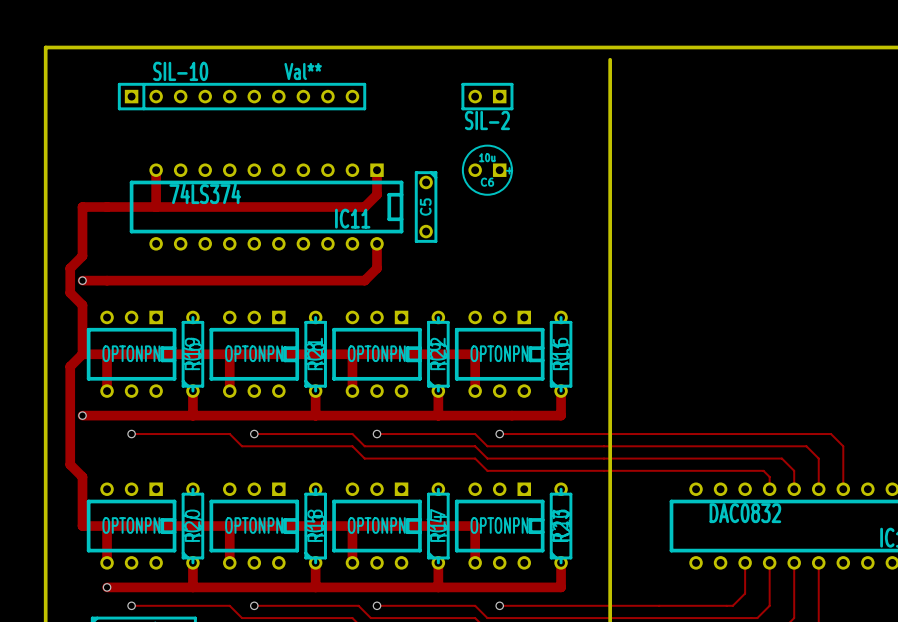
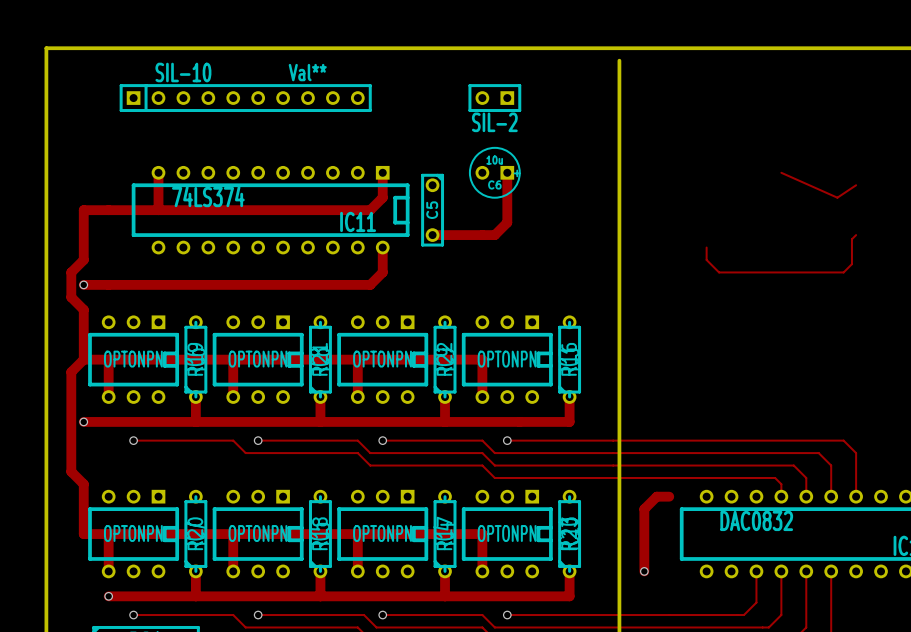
track: none -> (507, 172) (507, 222) (494, 235) (432, 235)
track: none -> (781, 172) (837, 197) (856, 185)
track: none -> (856, 235) (851, 239) (851, 264) (843, 272) (719, 272) (706, 259) (706, 247)
track: none -> (669, 496) (656, 496) (644, 509) (644, 571)
via: none -> (644, 571)

